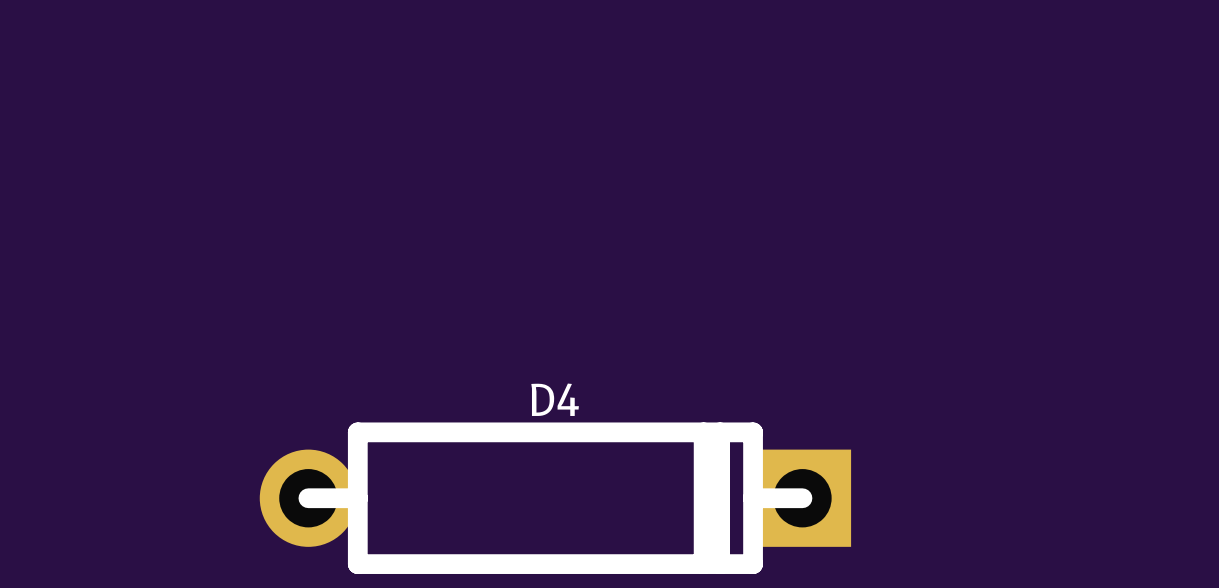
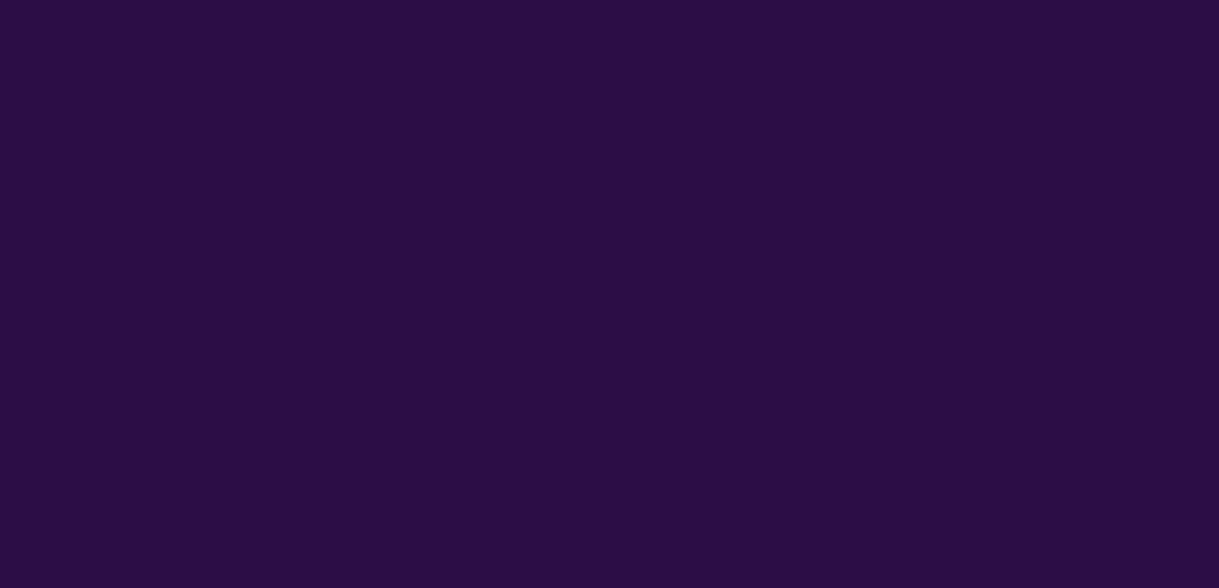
D4: (555, 498) -> none

